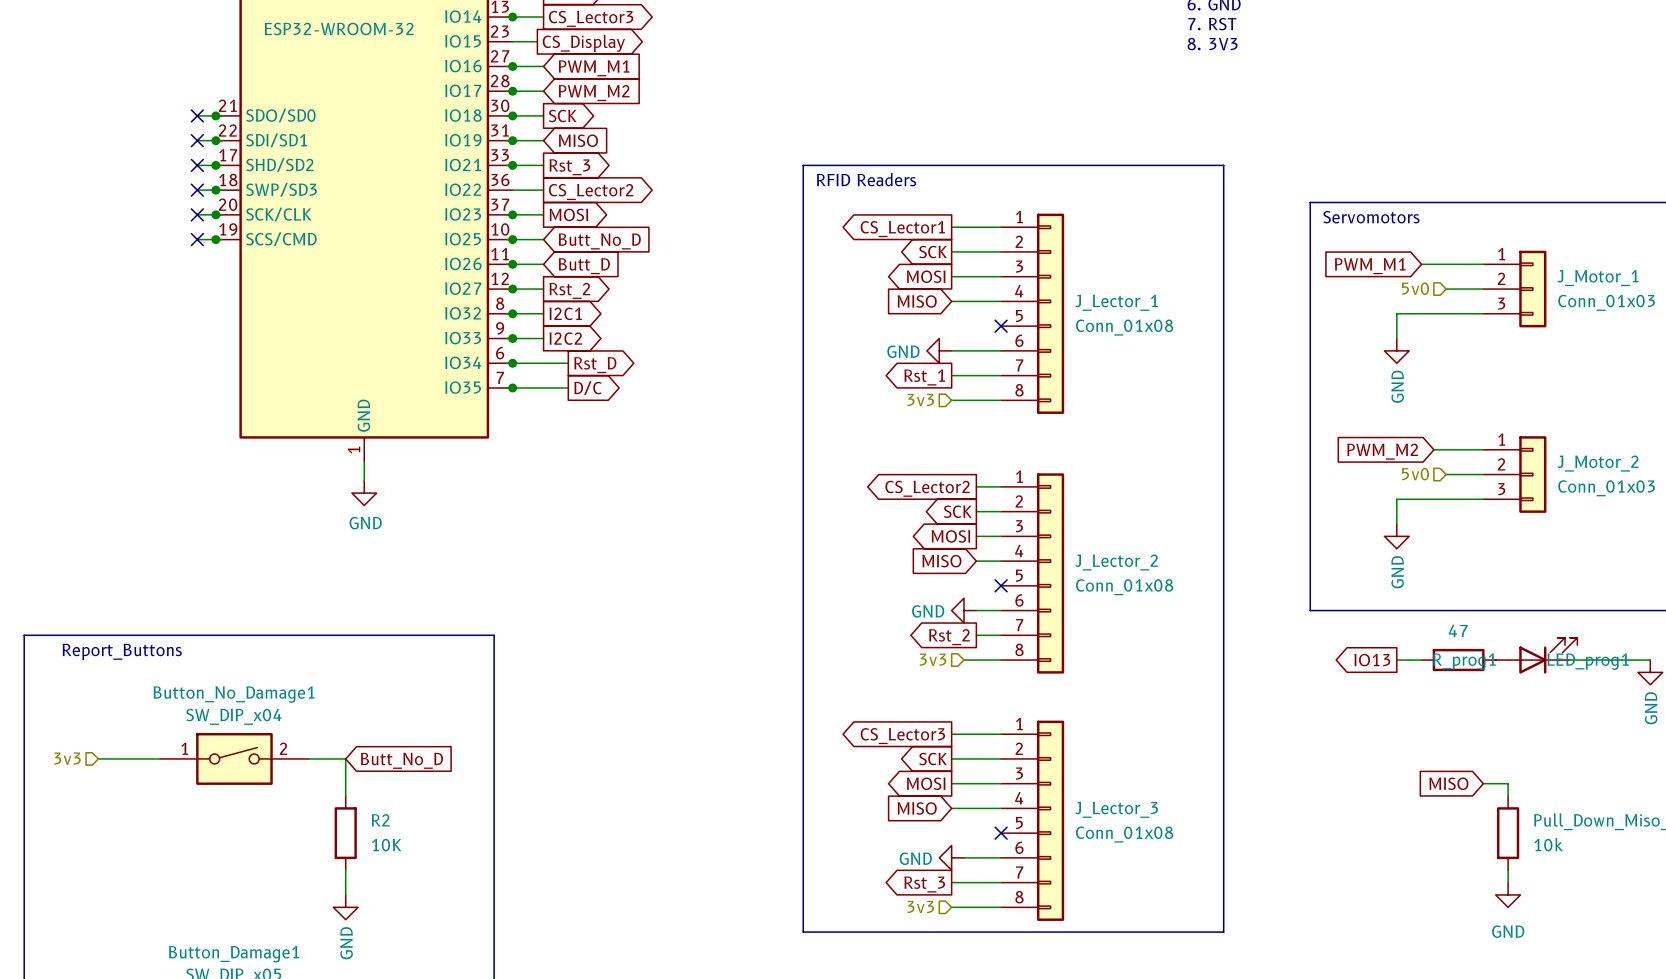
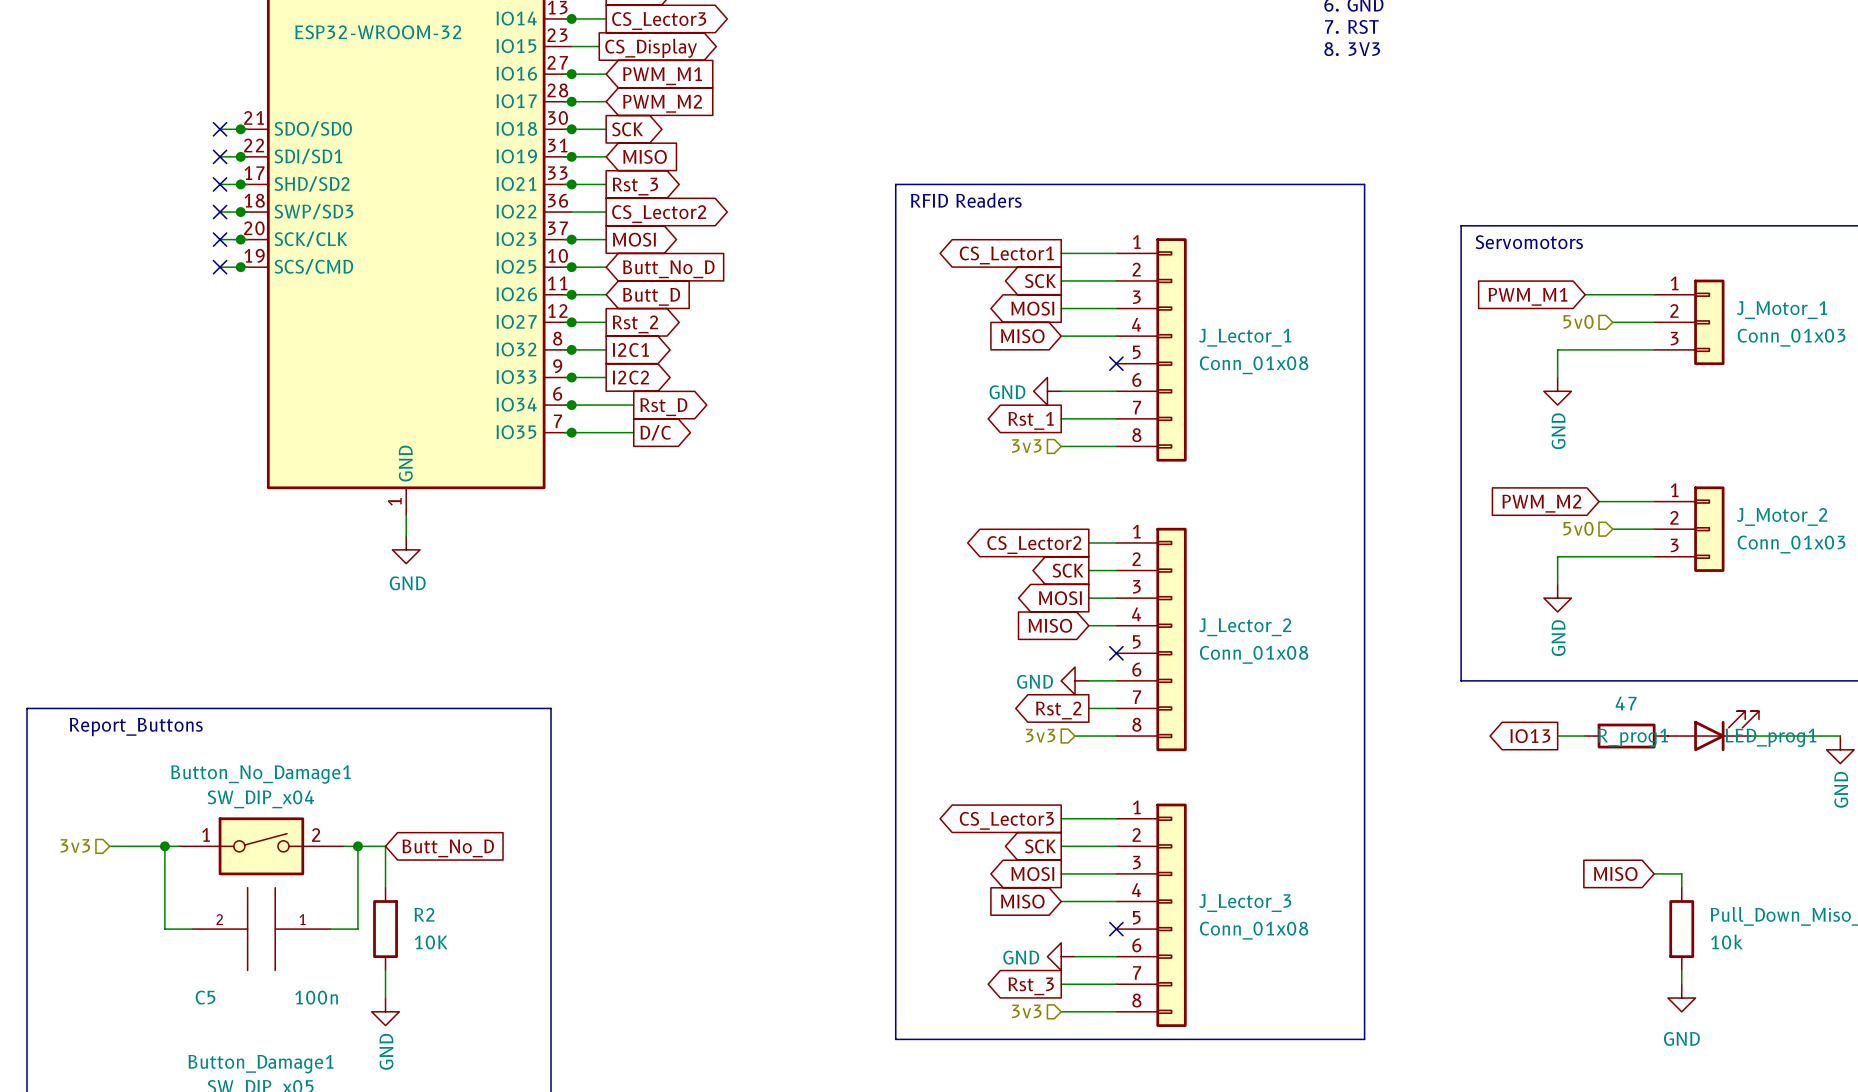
wire: none -> (164, 846) (164, 929) (192, 929)
junction: none -> (164, 846)
wire: none -> (357, 846) (357, 929) (330, 929)
junction: none -> (357, 846)
C5: none -> 100n (261, 929)

